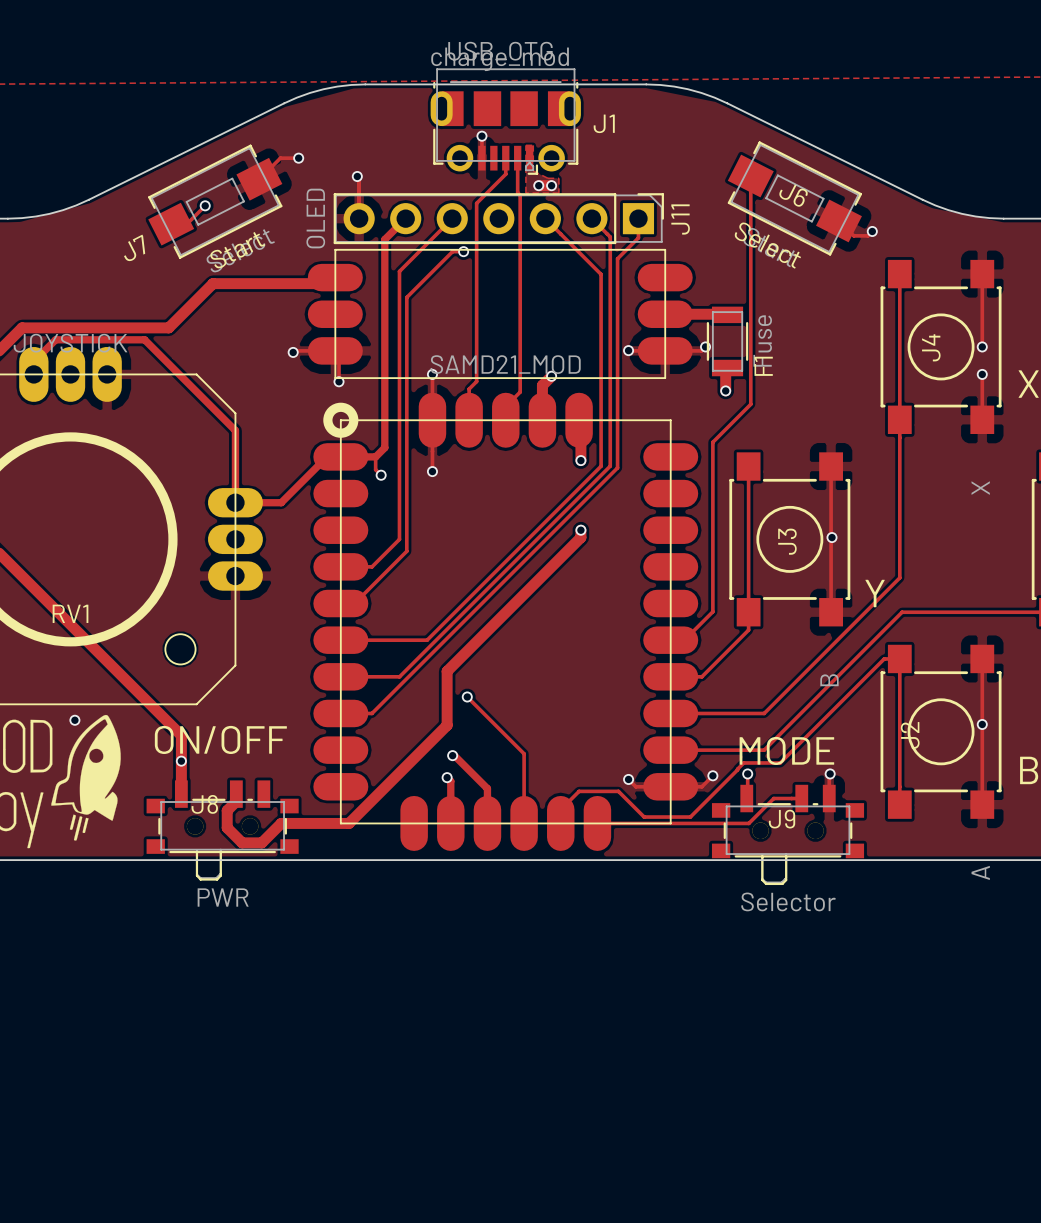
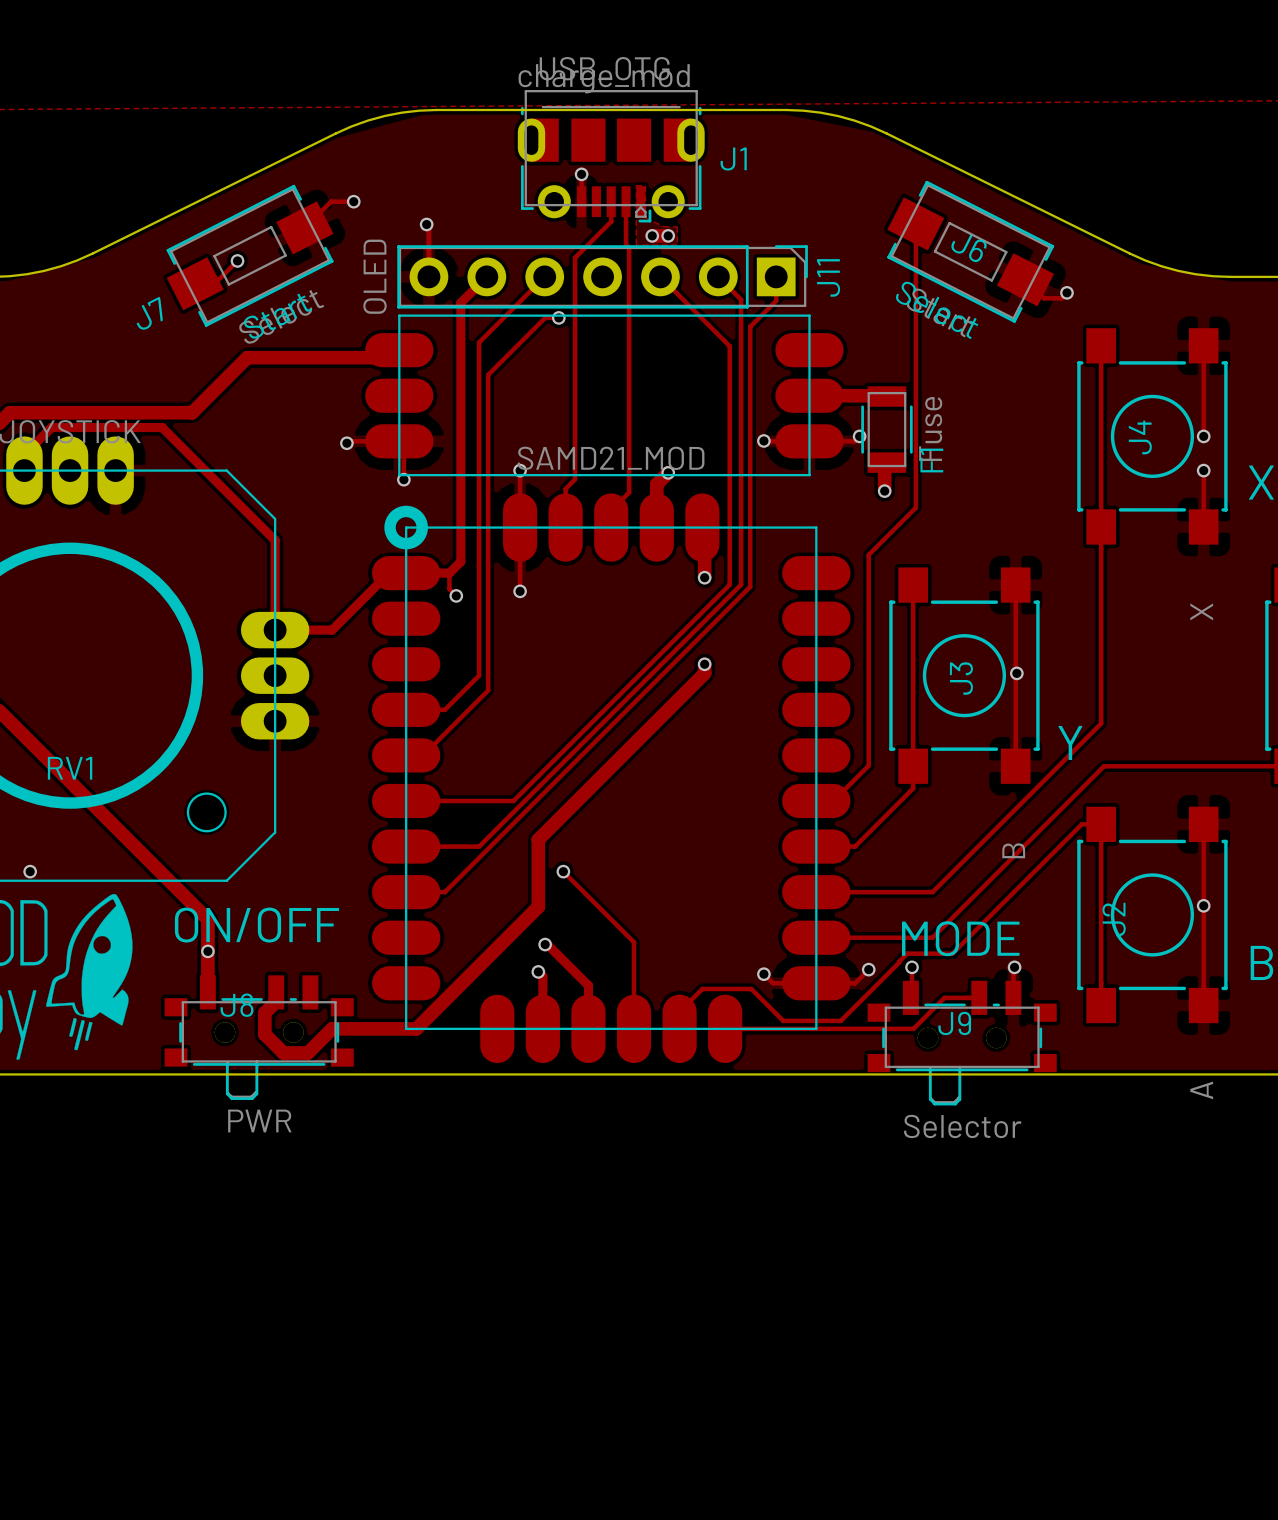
via position: (74, 720) -> (30, 871)

